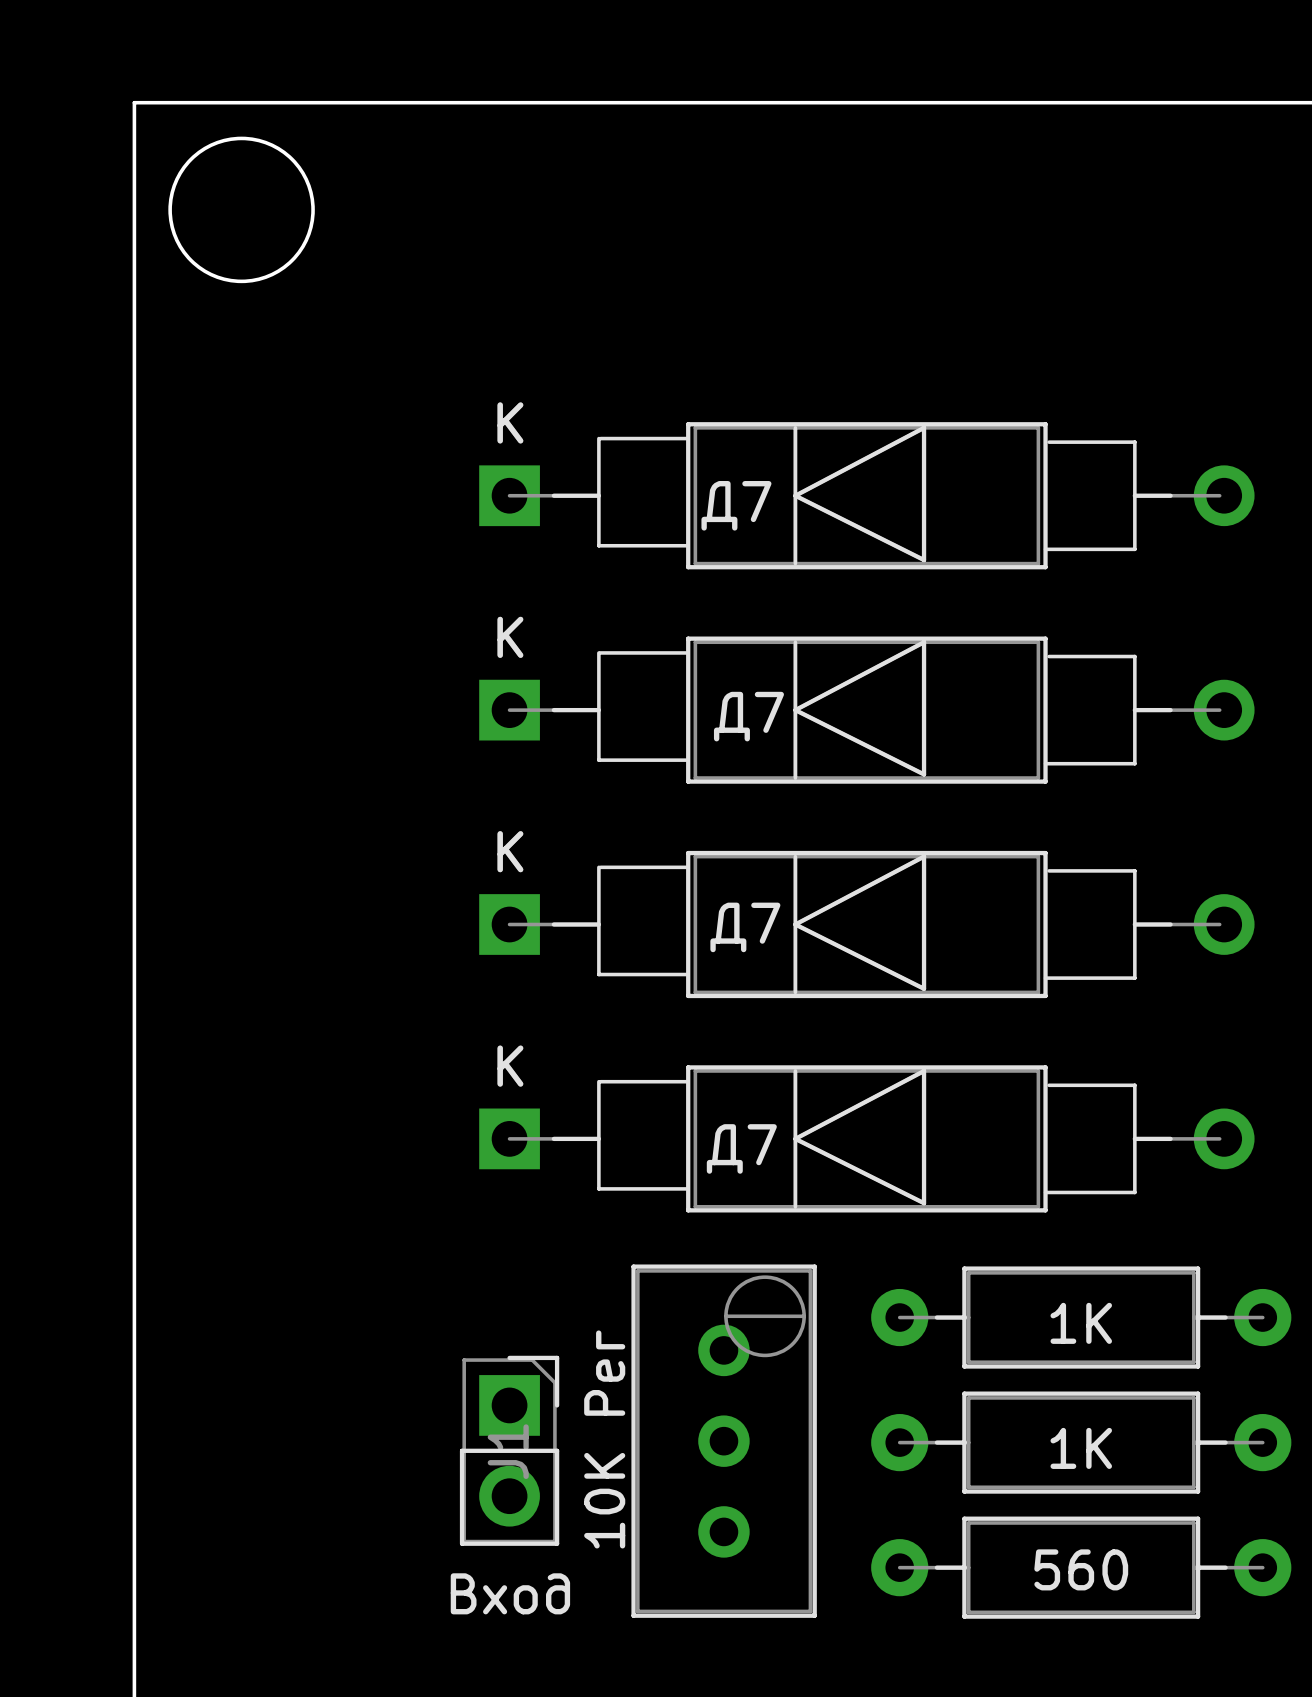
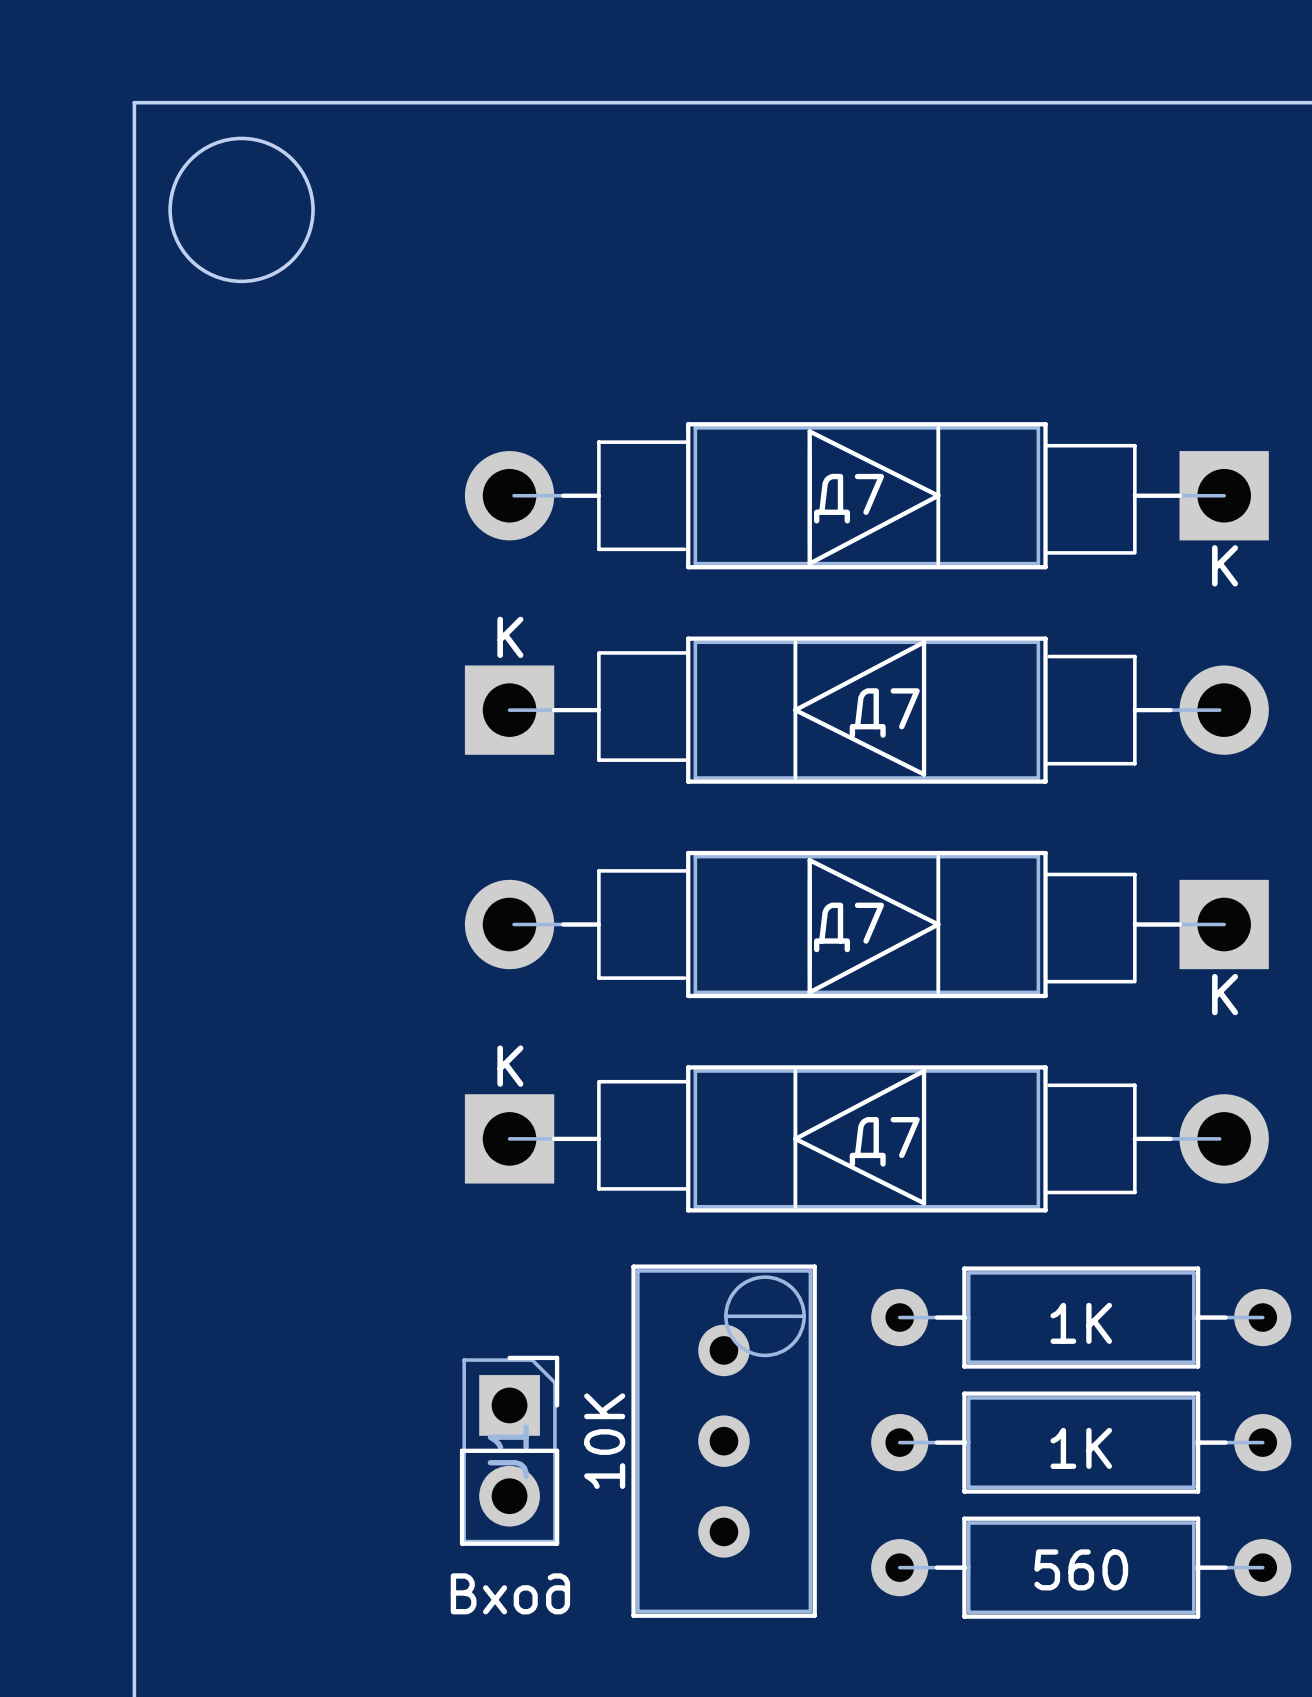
part: Д7 (866, 495) -> none
Д7: none -> (866, 495)
part: Д7 (866, 710) -> none
Д7: none -> (866, 710)
part footprint: [479, 850, 1255, 999] -> [464, 850, 1269, 999]
part value position: Д7 (745, 927) -> Д7 (849, 927)
part footprint: [479, 1065, 1255, 1213] -> [464, 1065, 1269, 1213]
part value position: Д7 (741, 1148) -> Д7 (884, 1141)
part value: 10K Рег (604, 1439) -> 10K (604, 1441)

